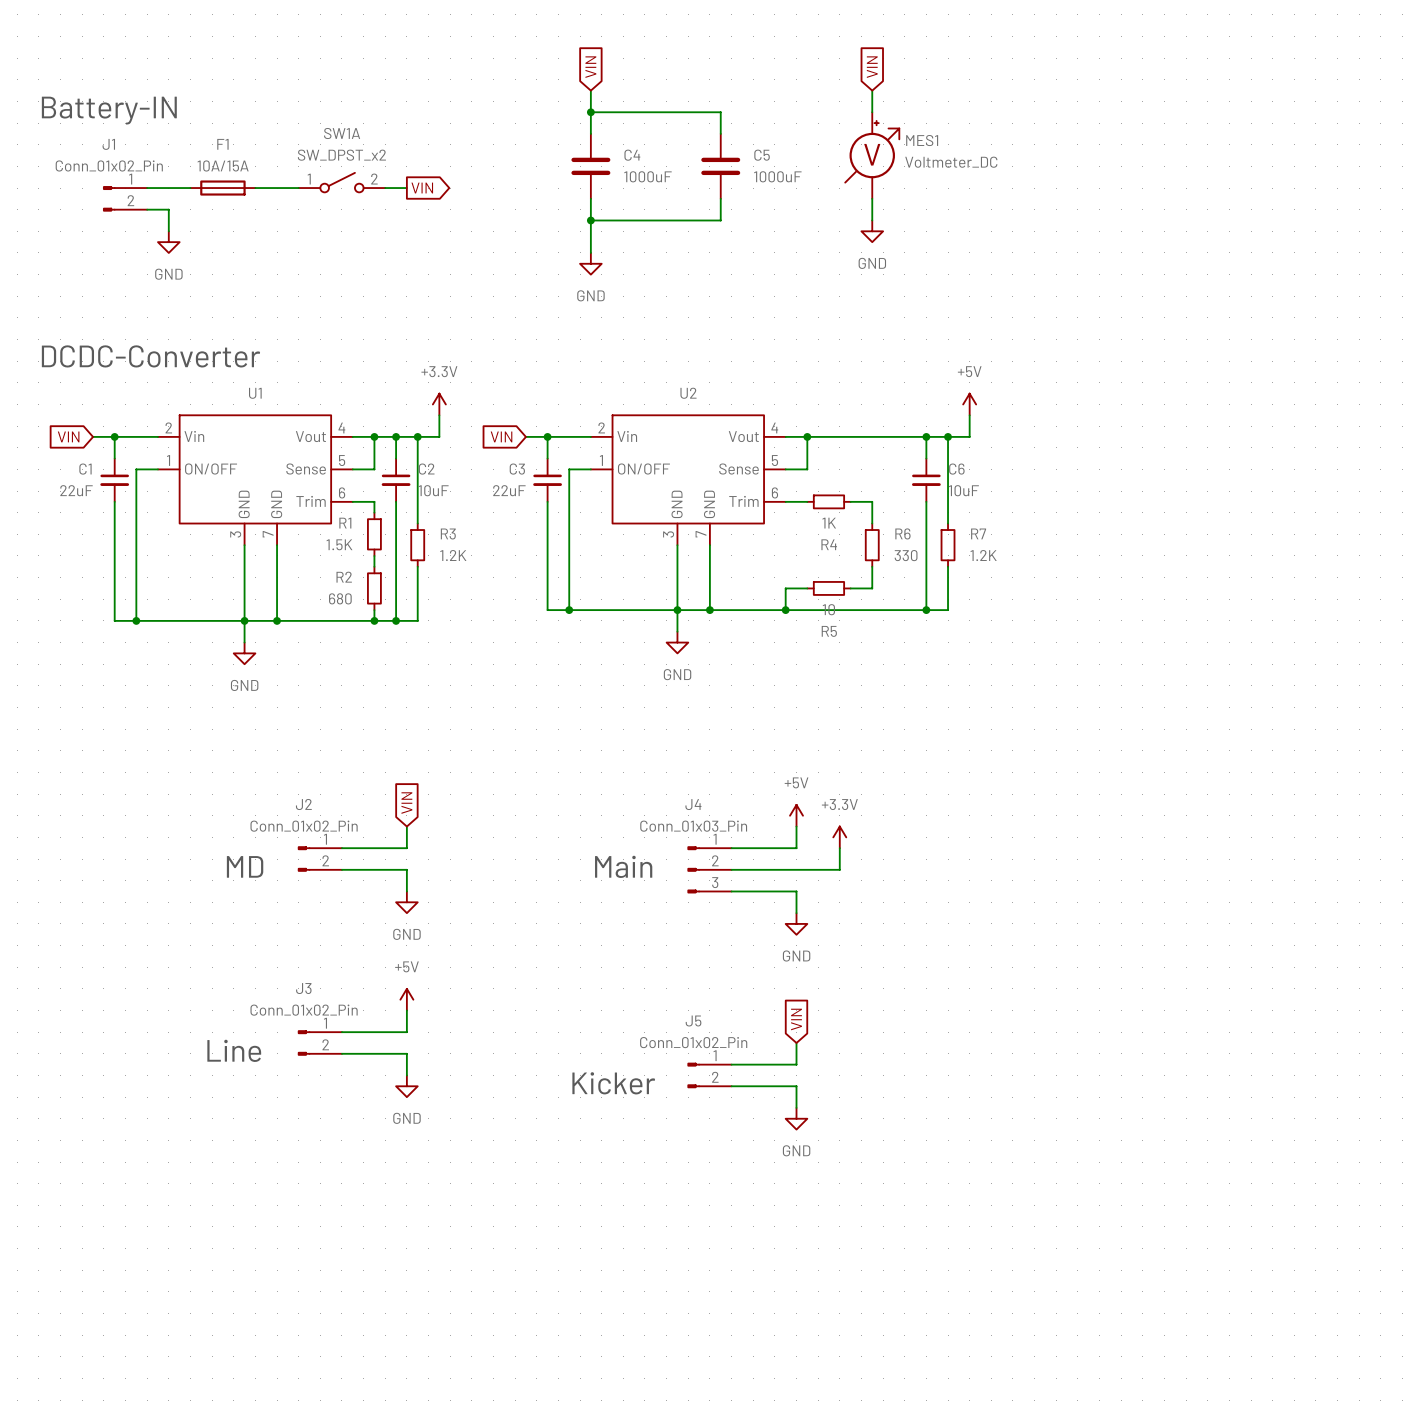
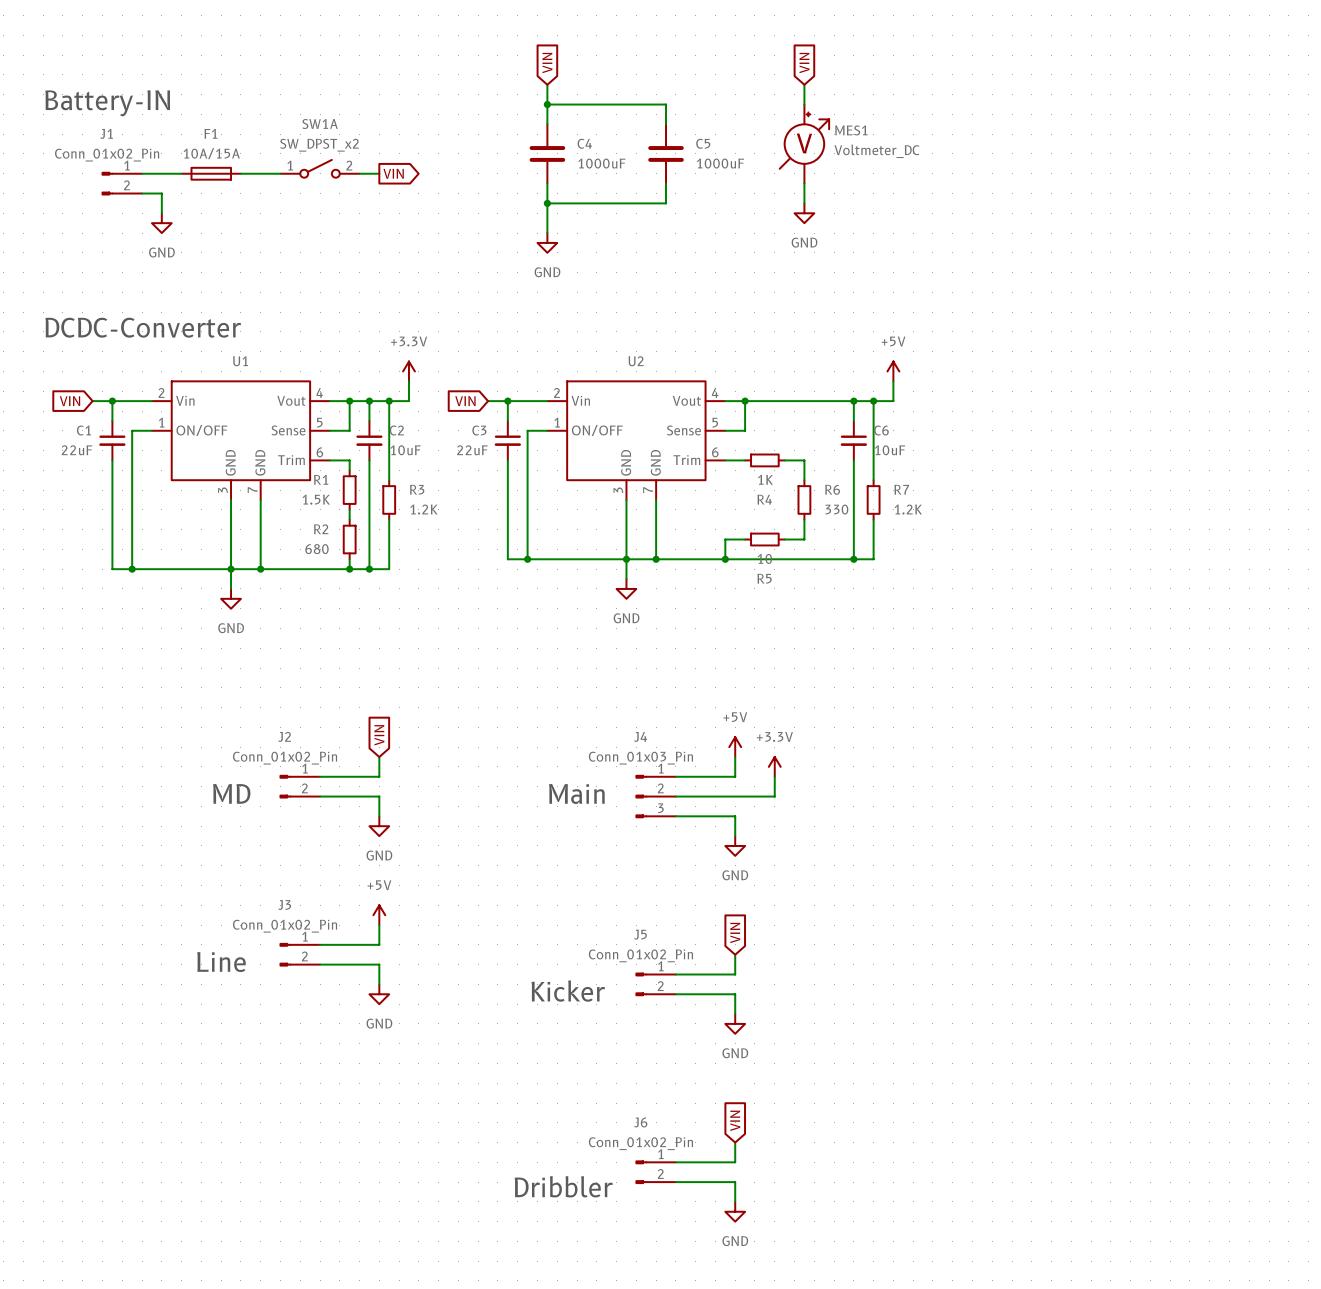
global label: none -> VIN (735, 1120)
wire: none -> (735, 1142) (735, 1162) (675, 1162)
J6: none -> Conn_01x02_Pin (655, 1172)
wire: none -> (675, 1182) (735, 1182) (735, 1201)
text: none -> Dribbler (563, 1186)
power symbol: none -> GND (735, 1211)

